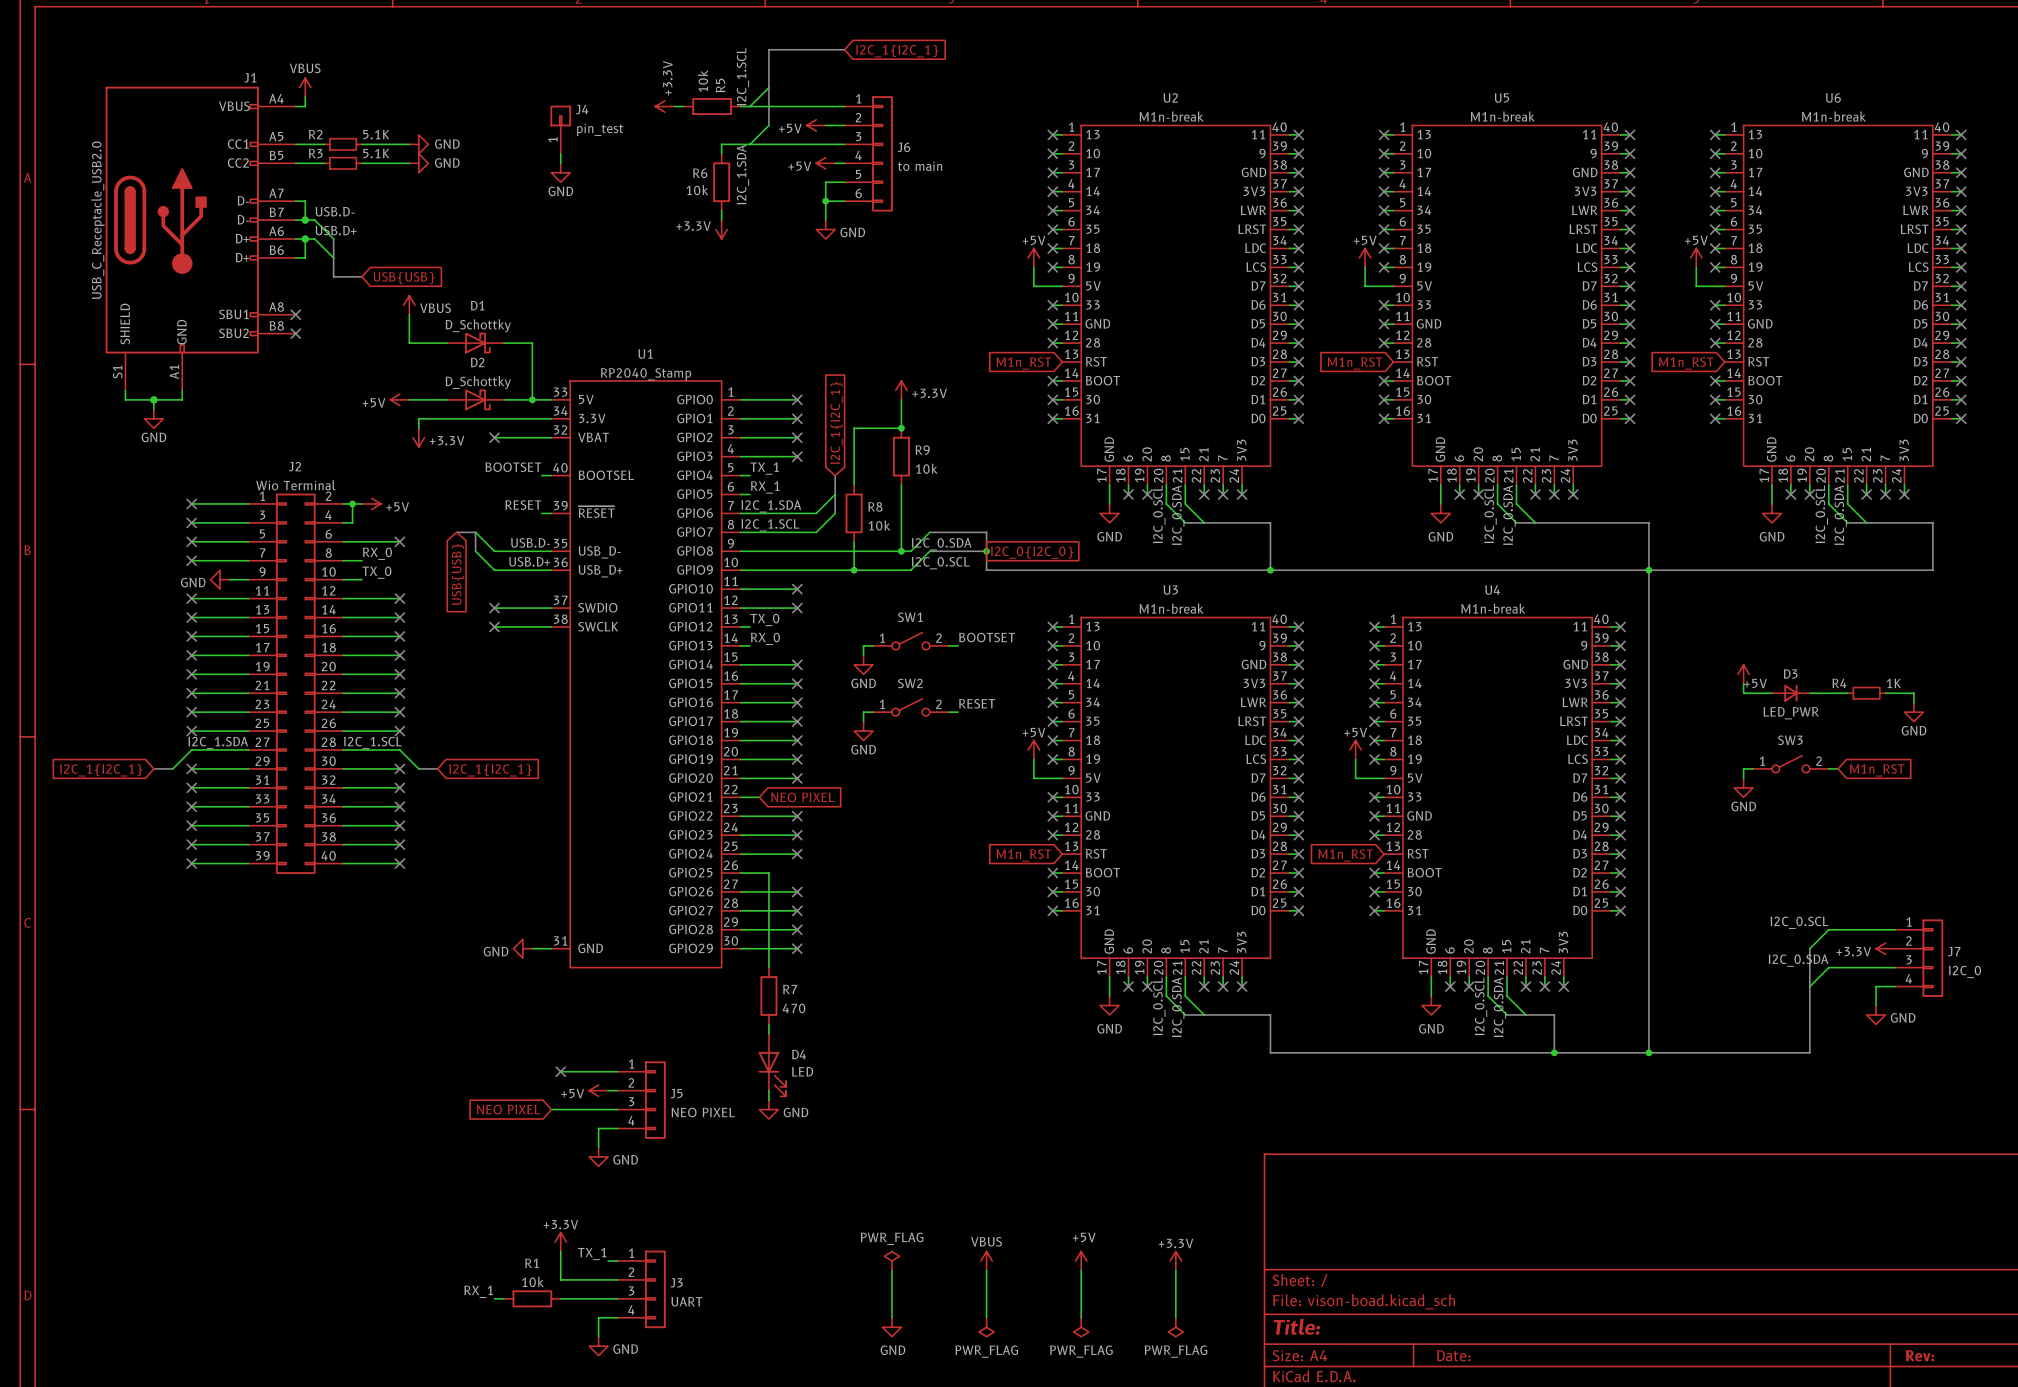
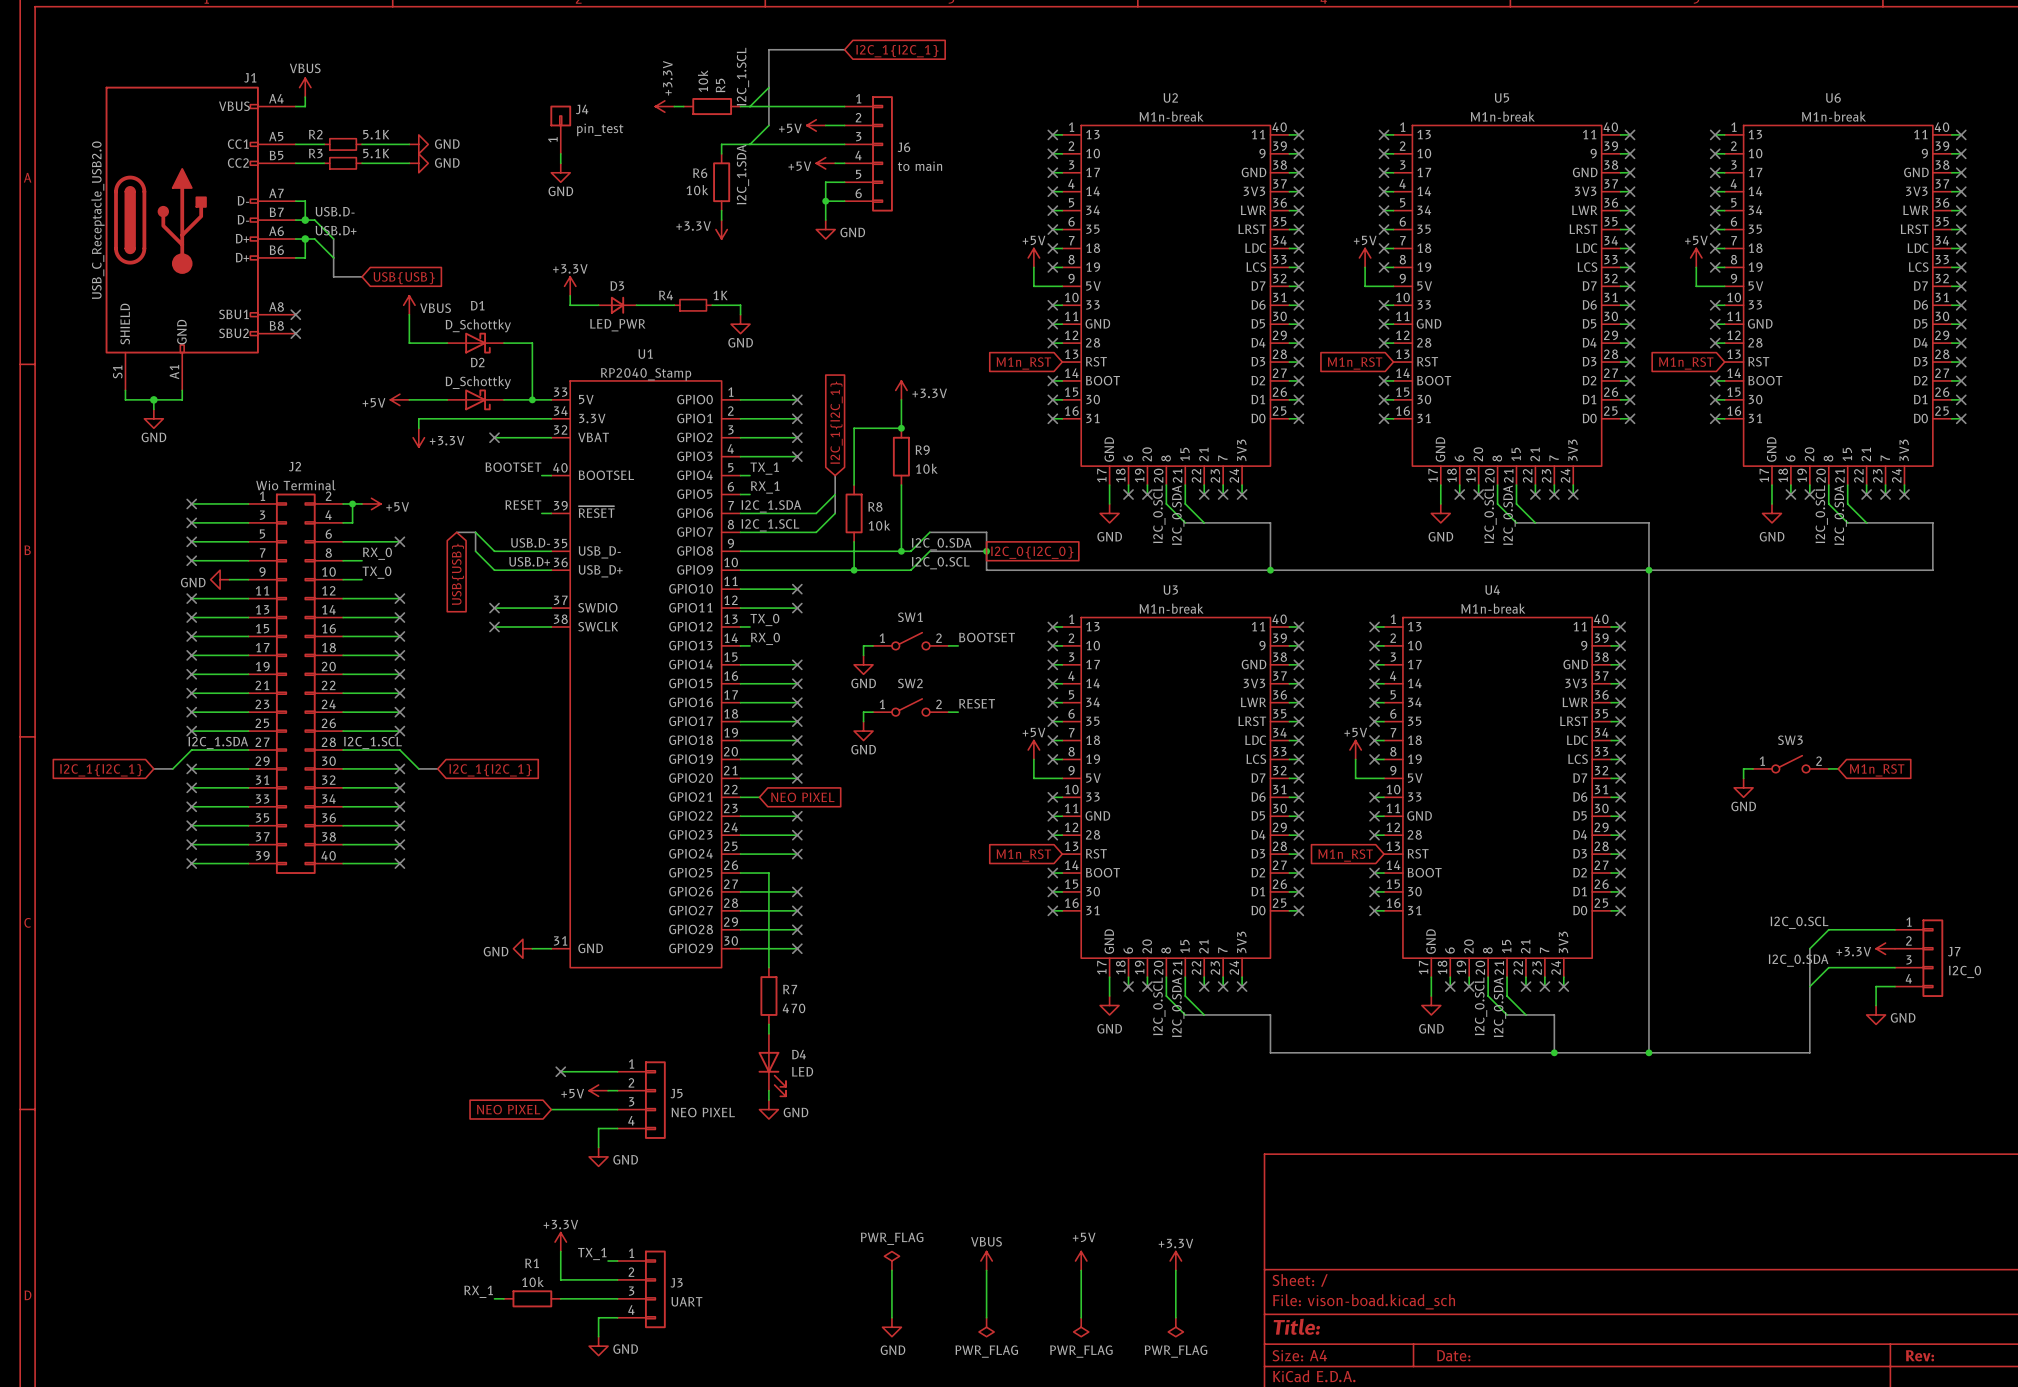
power symbol: none -> +3.3V (570, 286)
wire: none -> (570, 295) (570, 305) (598, 305)
wire: none -> (636, 305) (674, 305)
wire: none -> (712, 305) (740, 305) (740, 314)
power symbol: none -> GND (740, 324)
power symbol: +5V (1743, 674) -> none
wire: (1743, 683) (1743, 693) (1771, 693) -> none
D3 position: (1790, 693) -> (617, 305)
wire: (1809, 693) (1847, 693) -> none
R4 position: (1866, 693) -> (693, 305)
wire: (1885, 693) (1913, 693) (1913, 702) -> none
power symbol: GND (1913, 712) -> none

